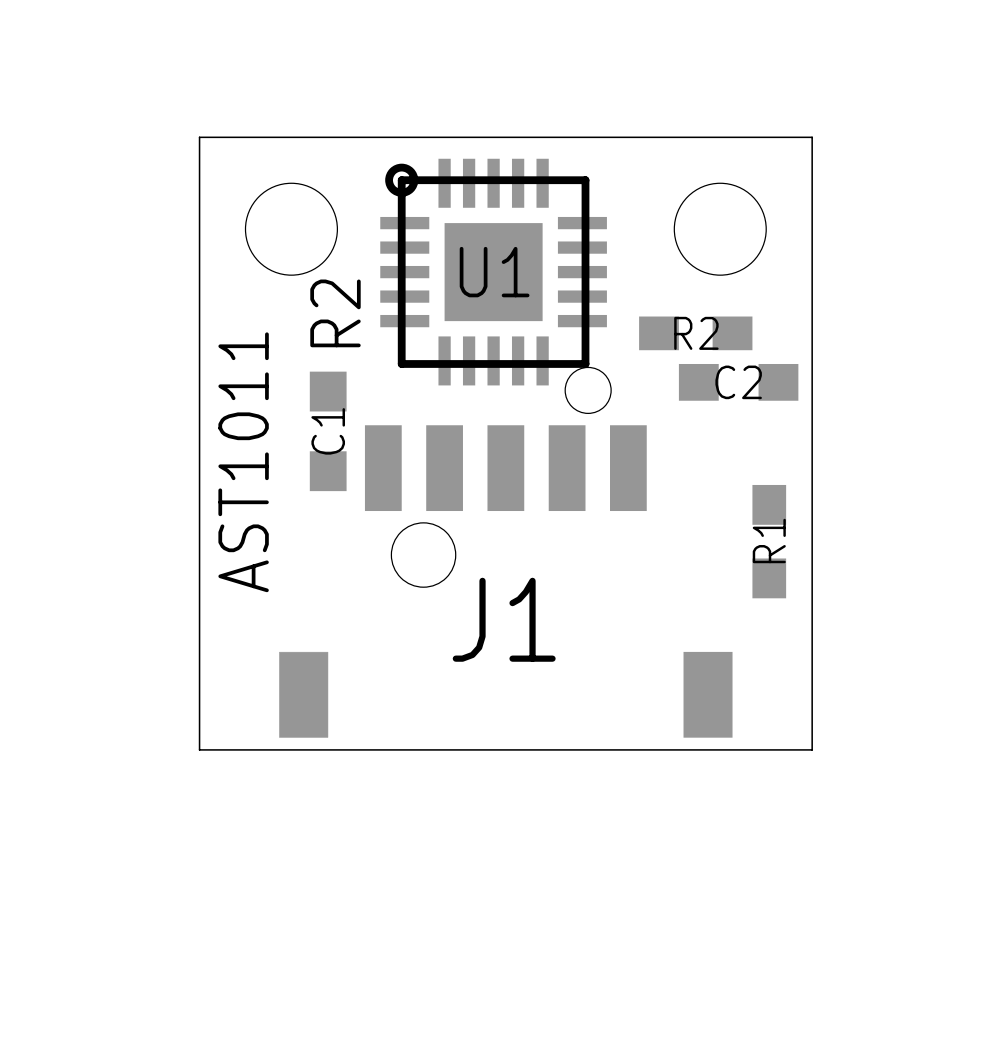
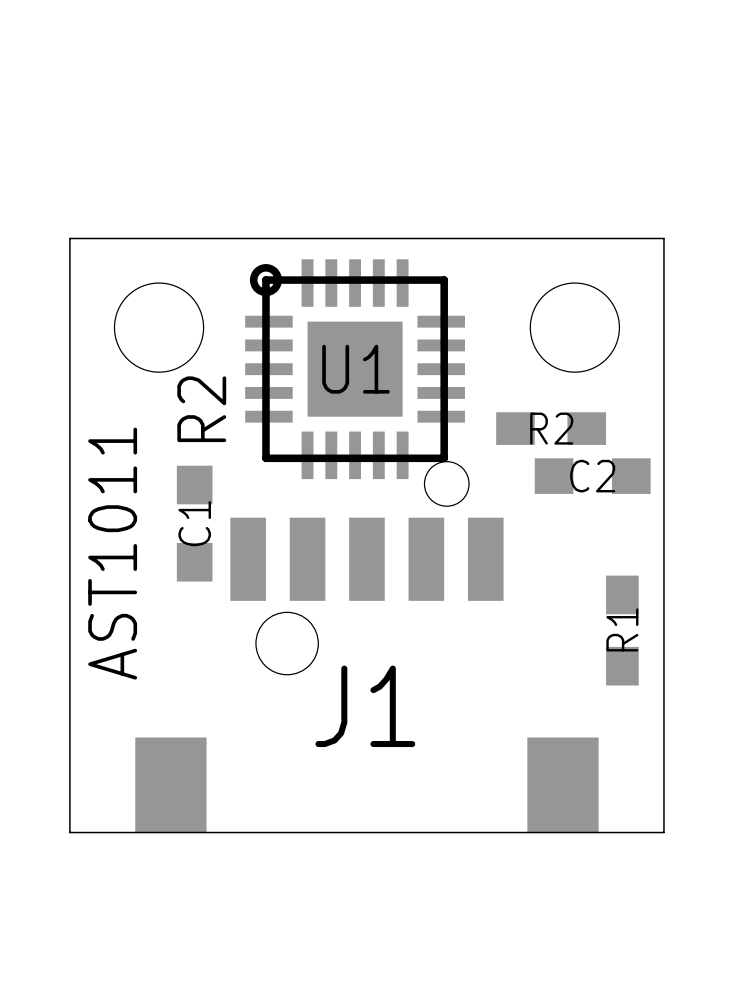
J1 footprint: [279, 425, 733, 738] -> [135, 517, 599, 833]

